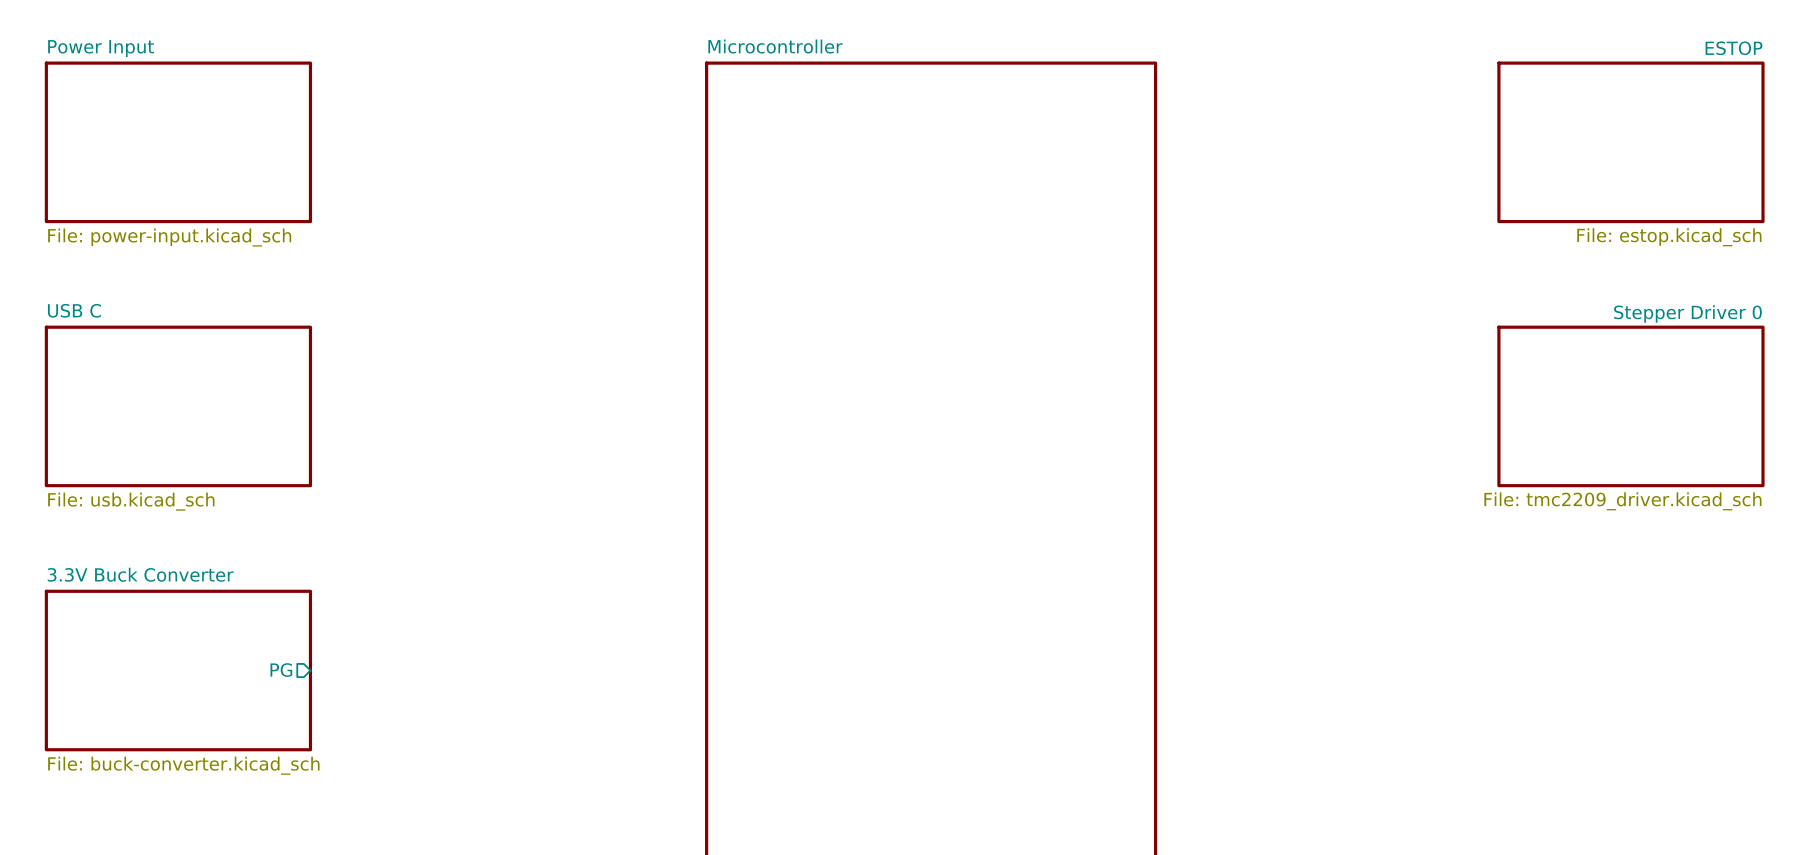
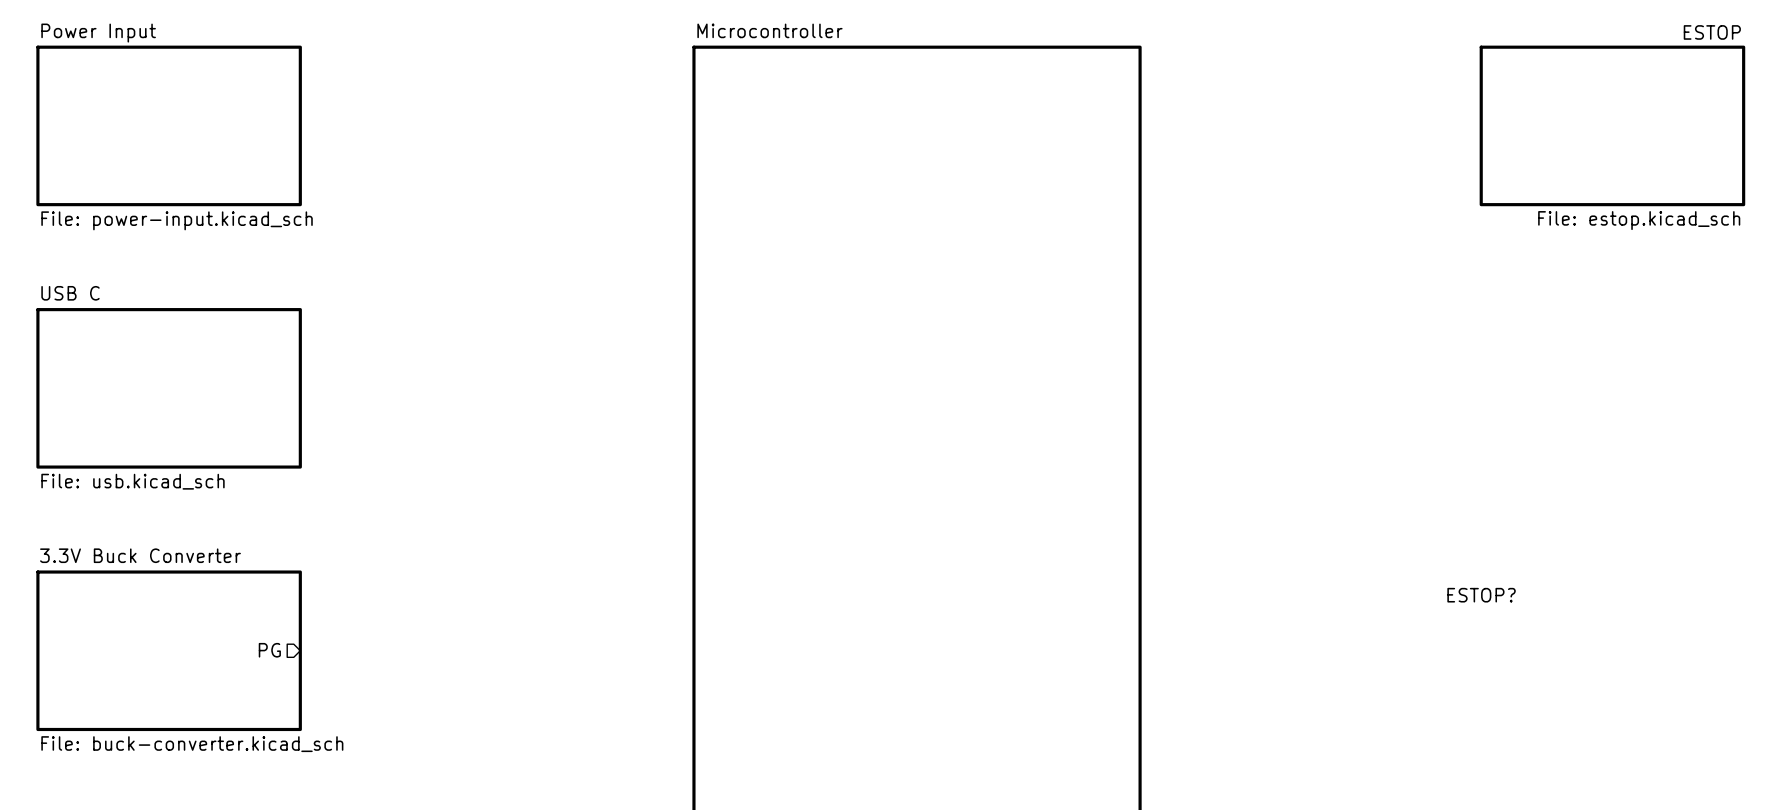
sheet Stepper Driver 0: File: tmc2209_driver.kicad_sch (1630, 406) -> none
text: none -> ESTOP? (1481, 595)

